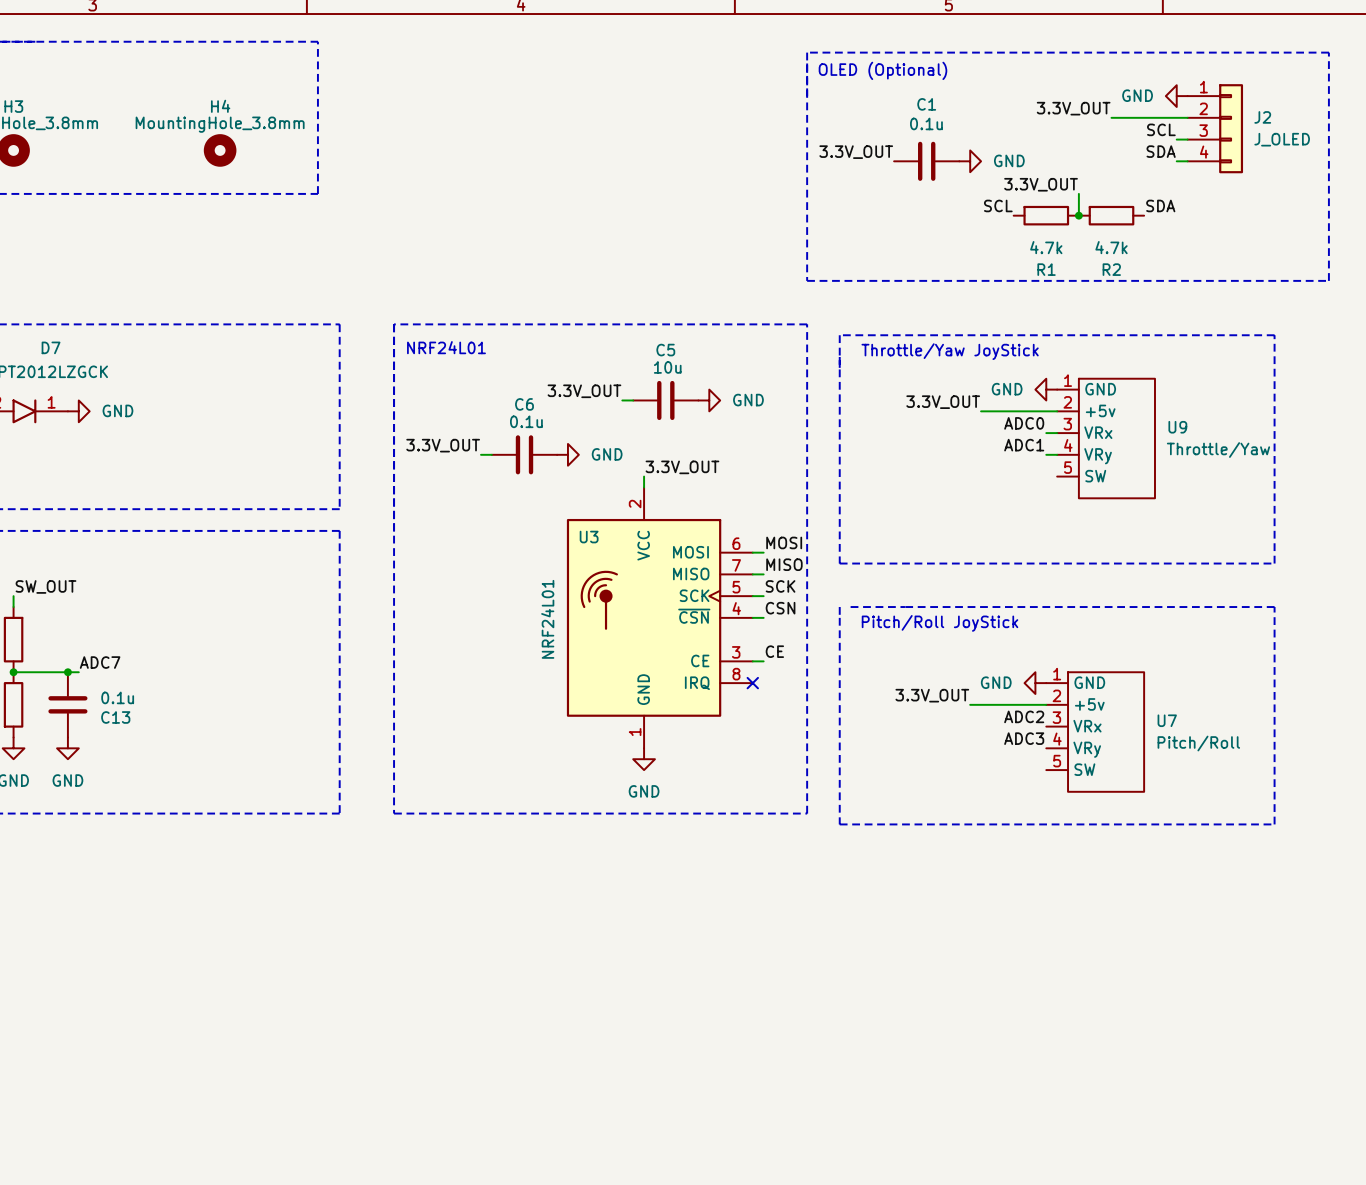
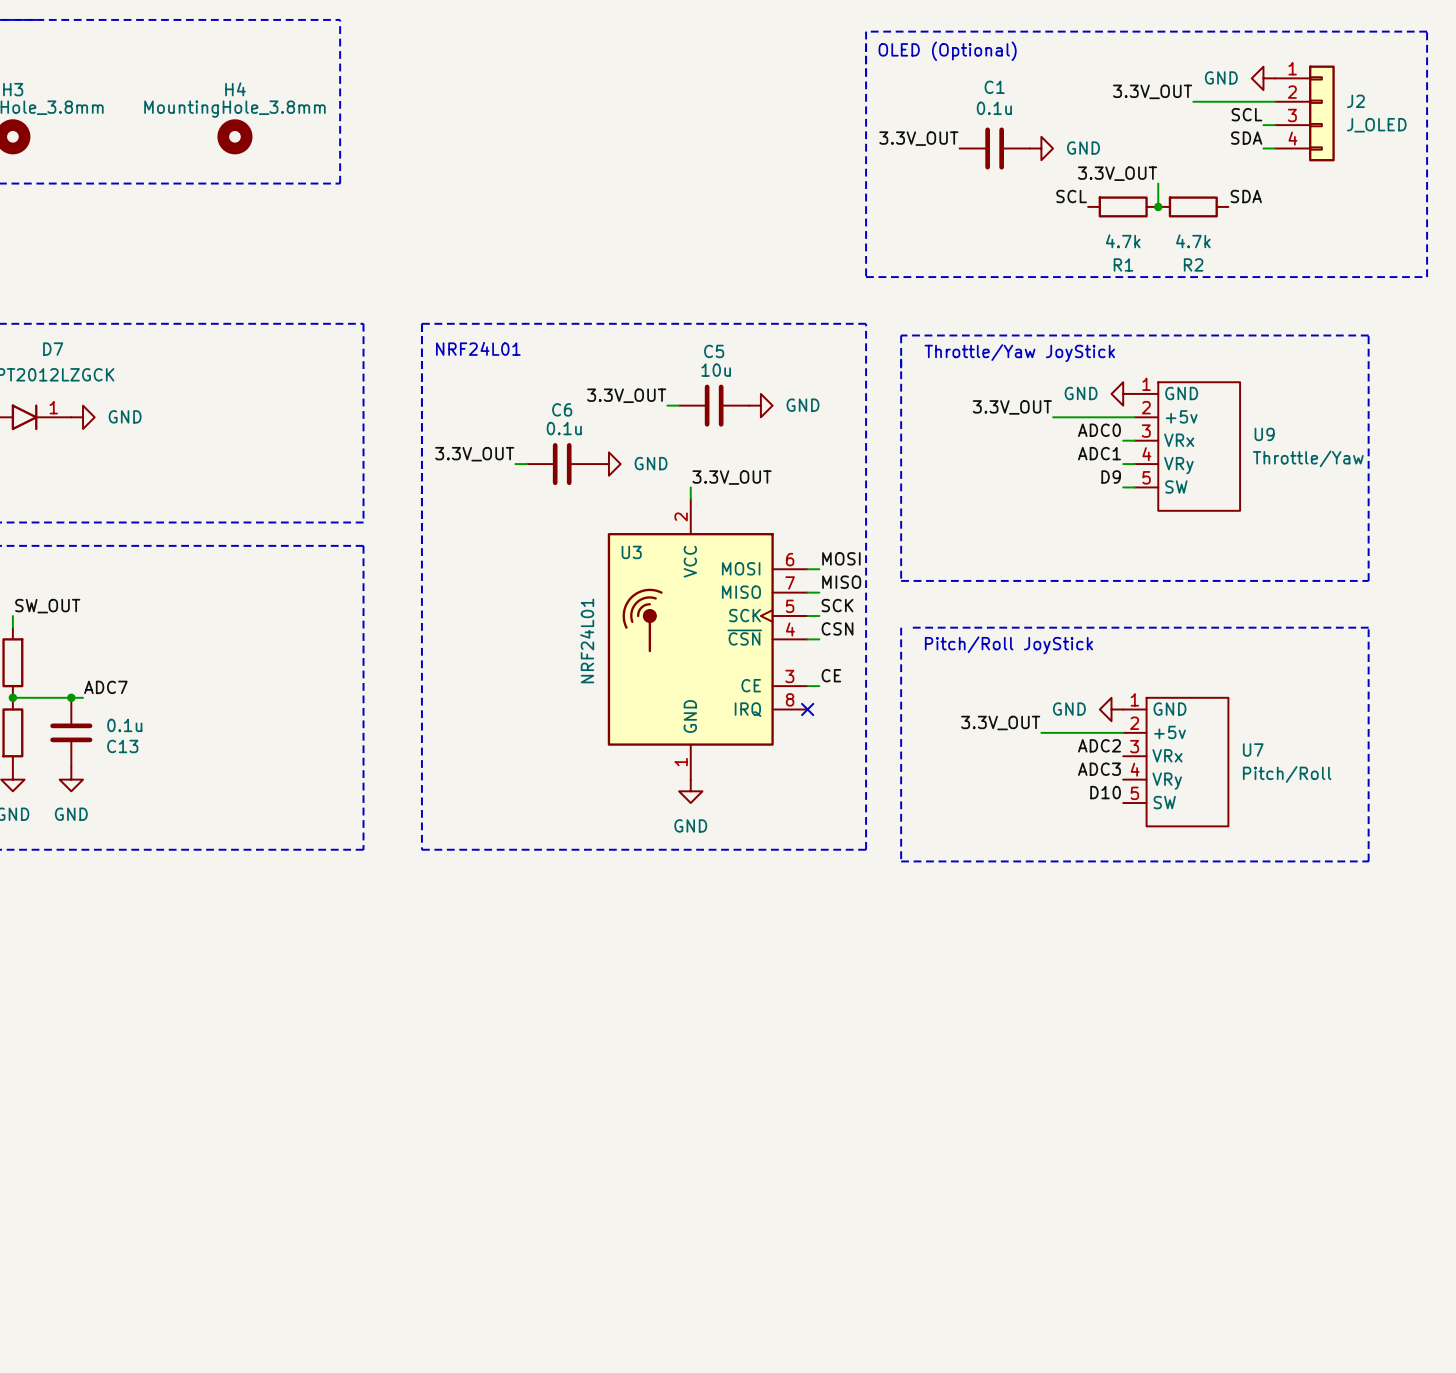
label: none -> D9 (1111, 477)
wire: none -> (1123, 487) (1134, 487)
label: none -> D10 (1105, 792)

